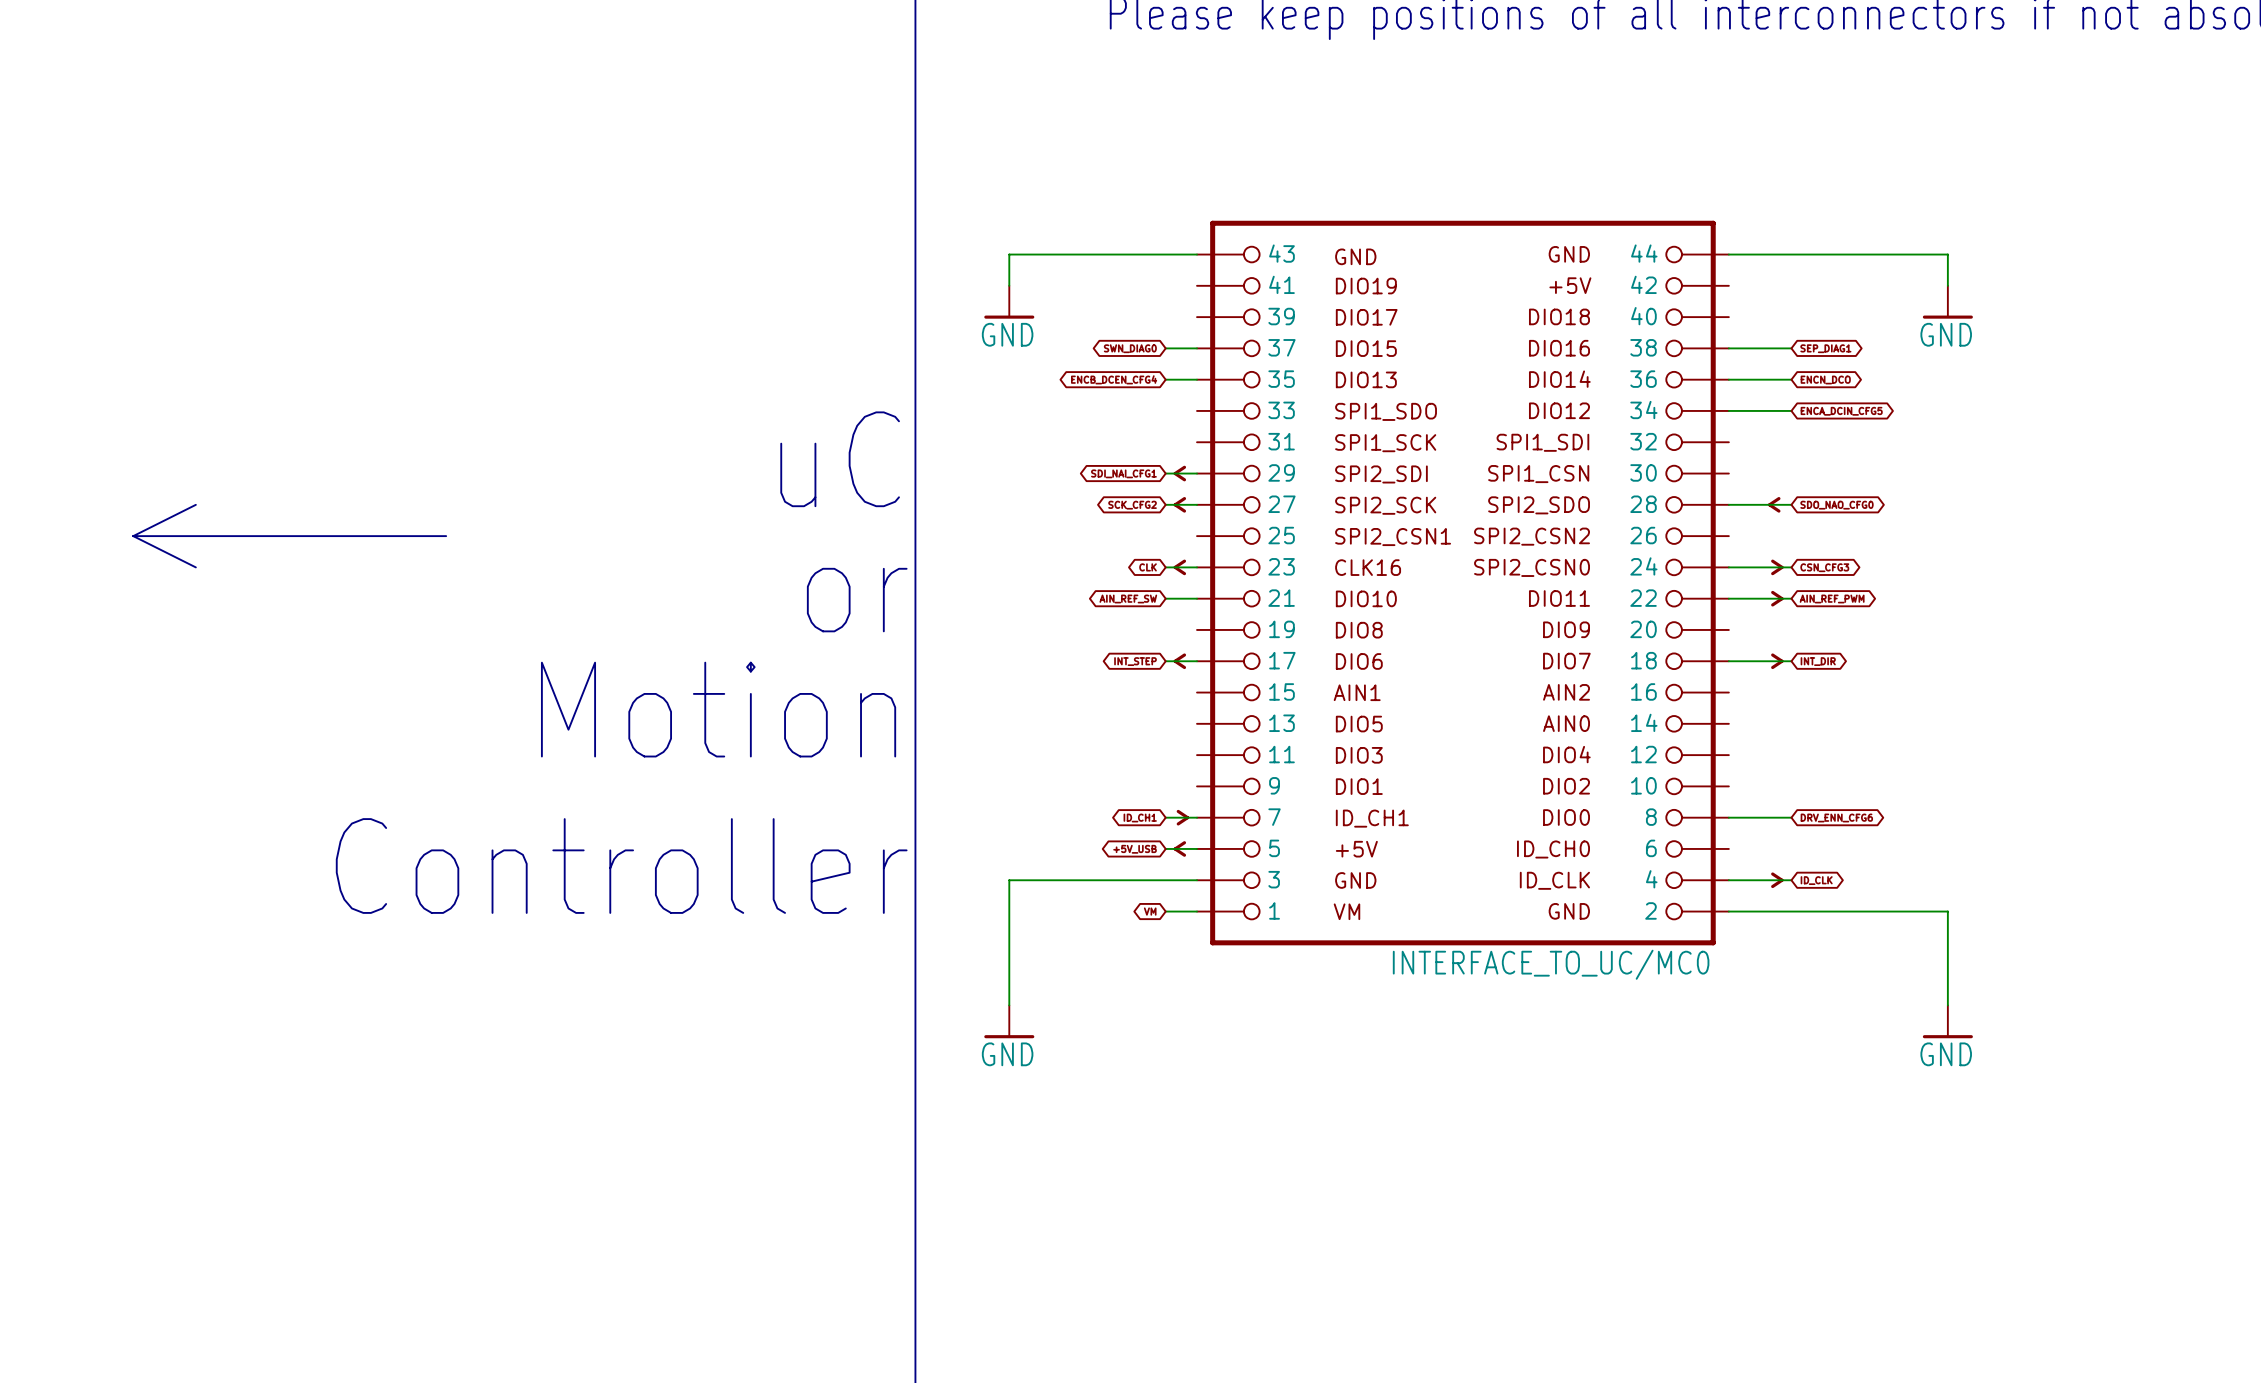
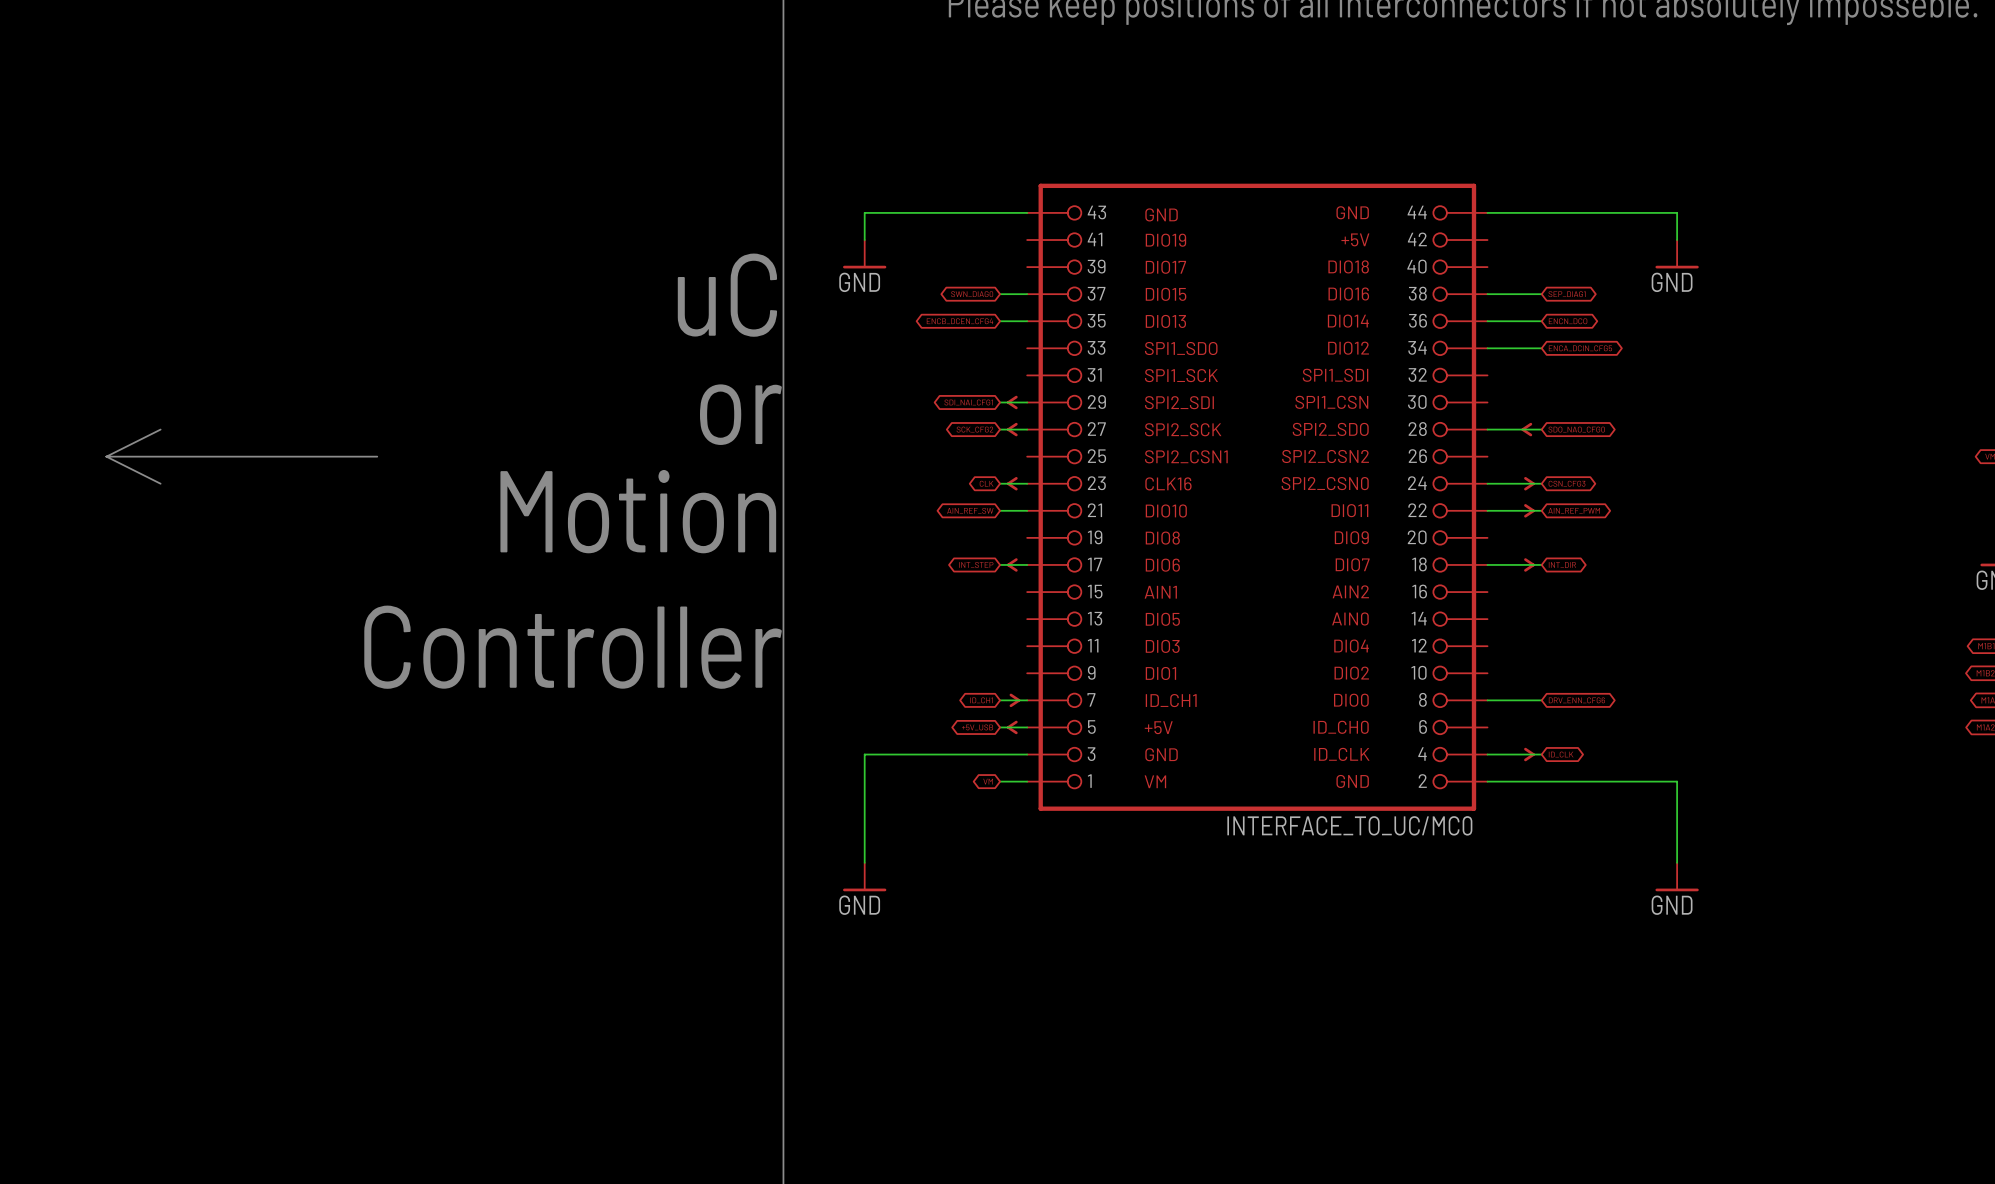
text position: uC (840, 459) -> uC (727, 295)
text position: or (857, 600) -> or (740, 414)
text position: Motion (718, 709) -> Motion (638, 511)
text position: Controller (621, 866) -> Controller (573, 647)

